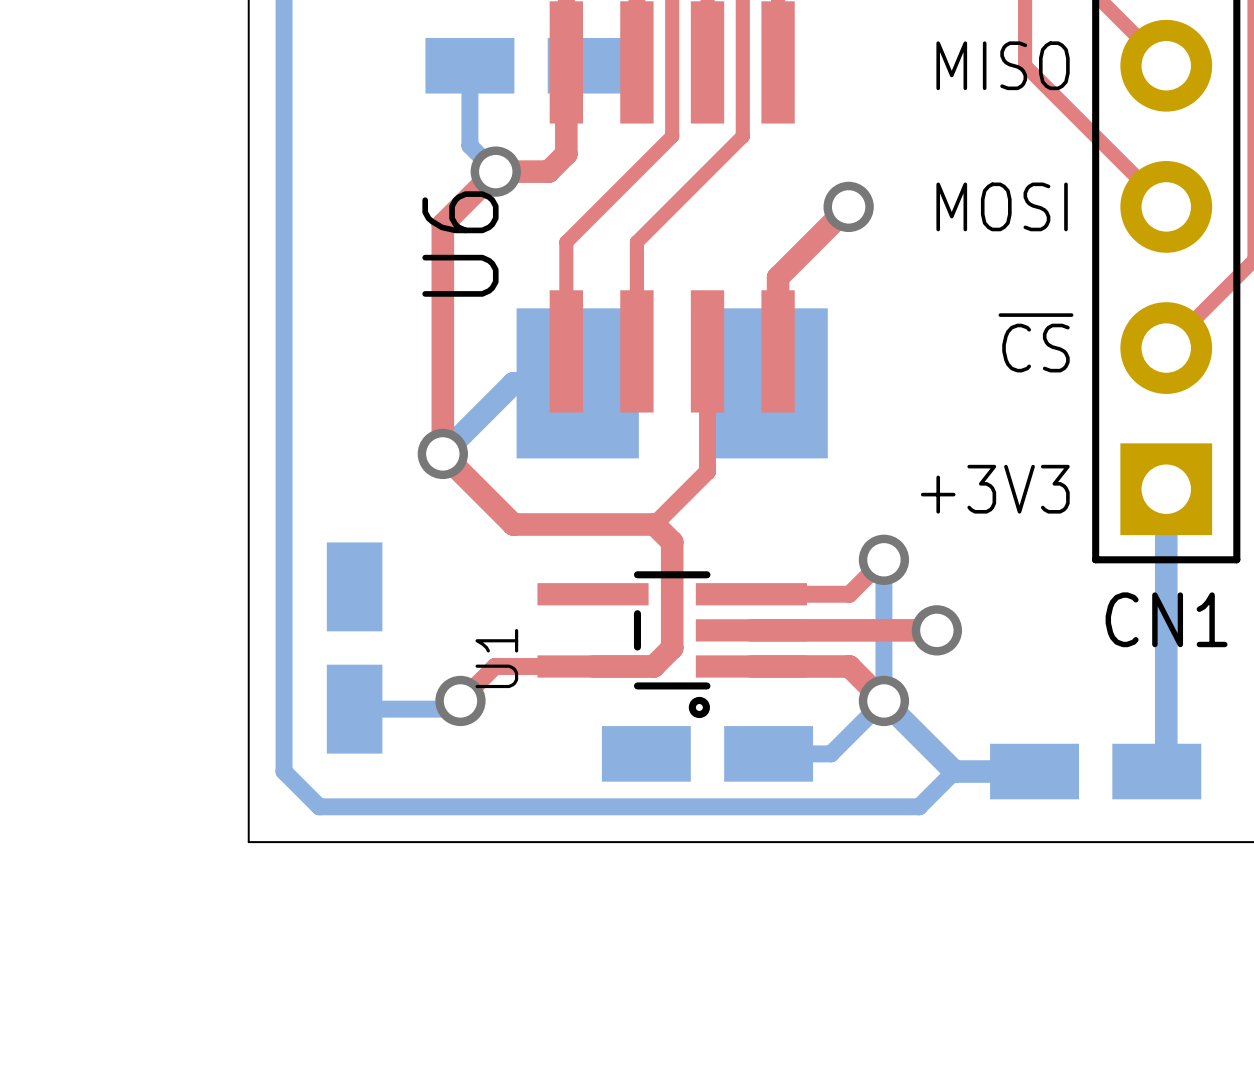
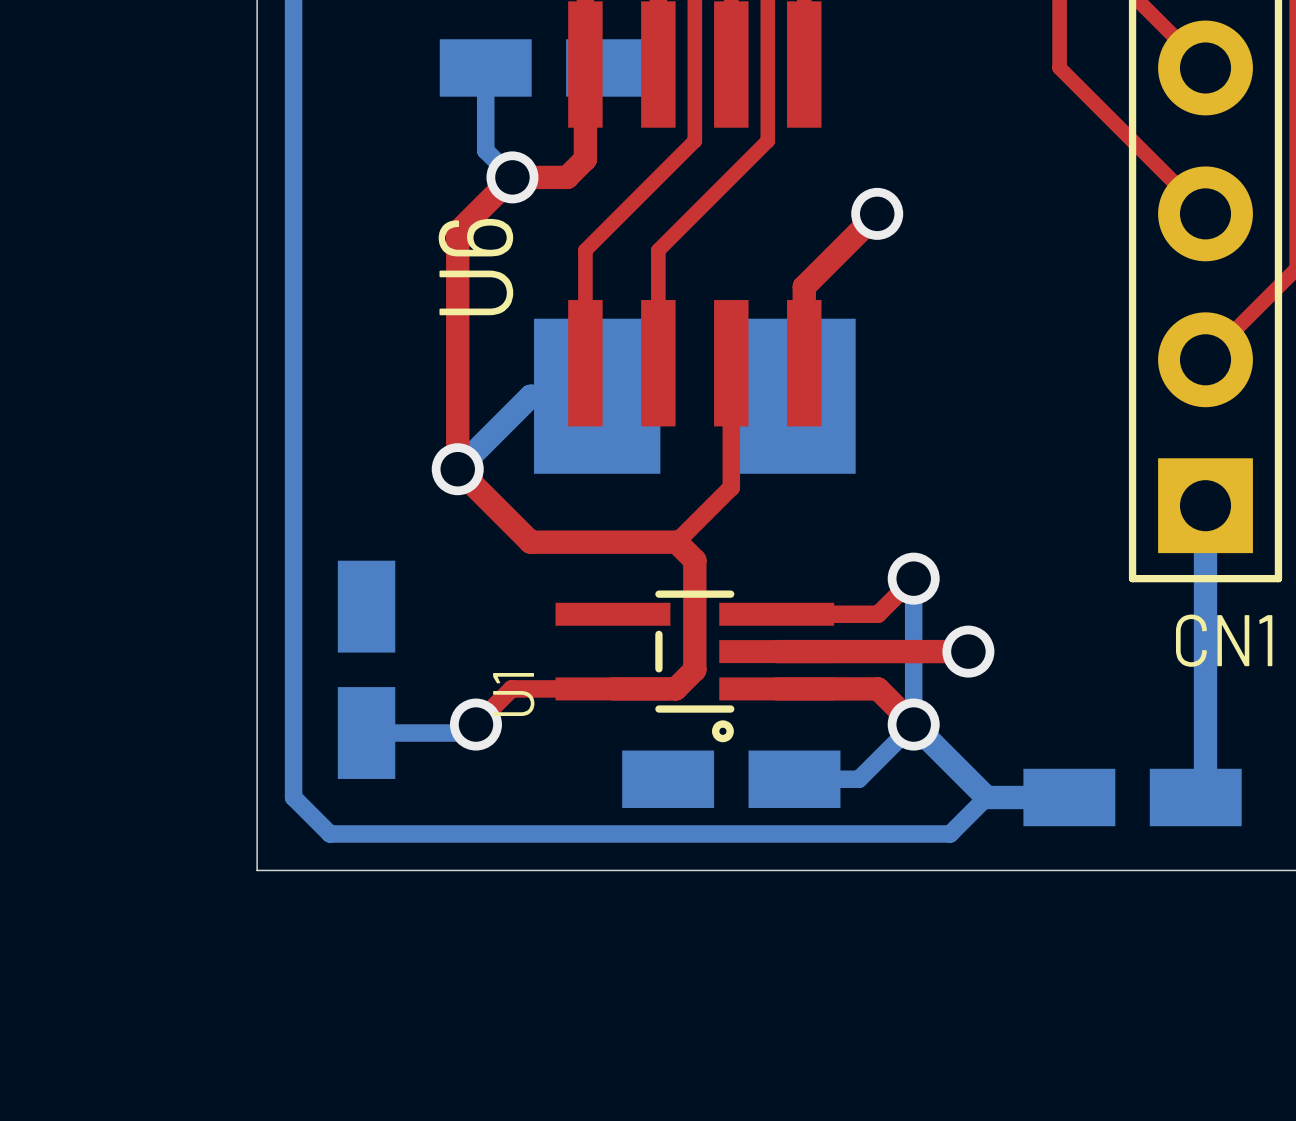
text: MISO (1003, 65) -> none
text: MOSI (1002, 206) -> none
text: ~{CS} (1035, 342) -> none
text: +3V3 (995, 489) -> none

